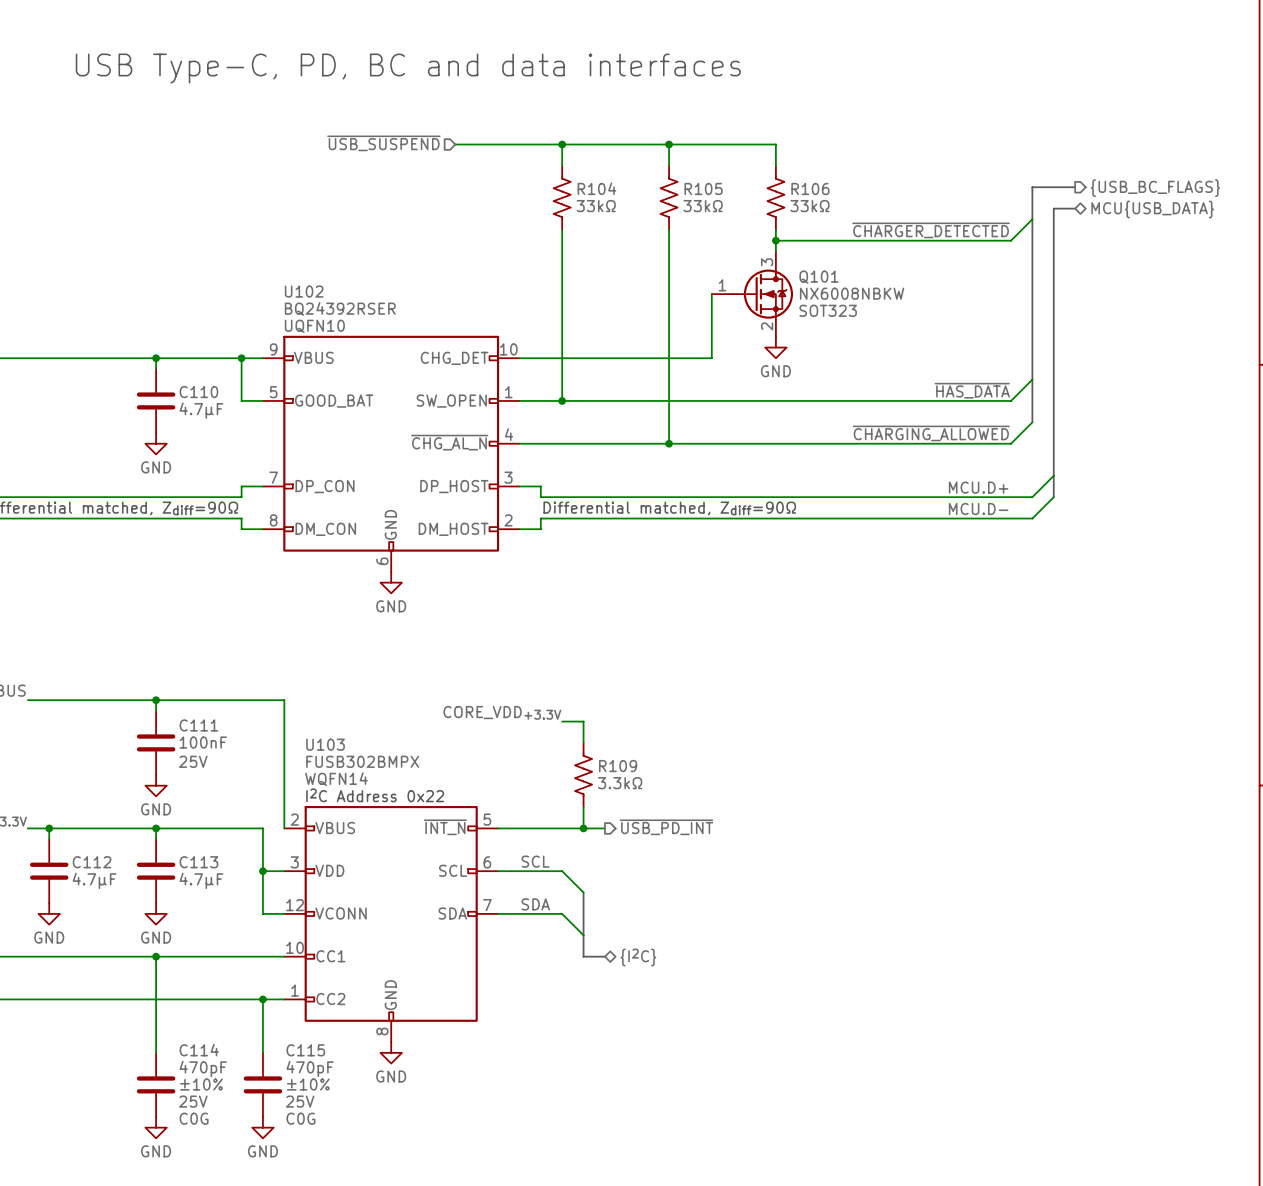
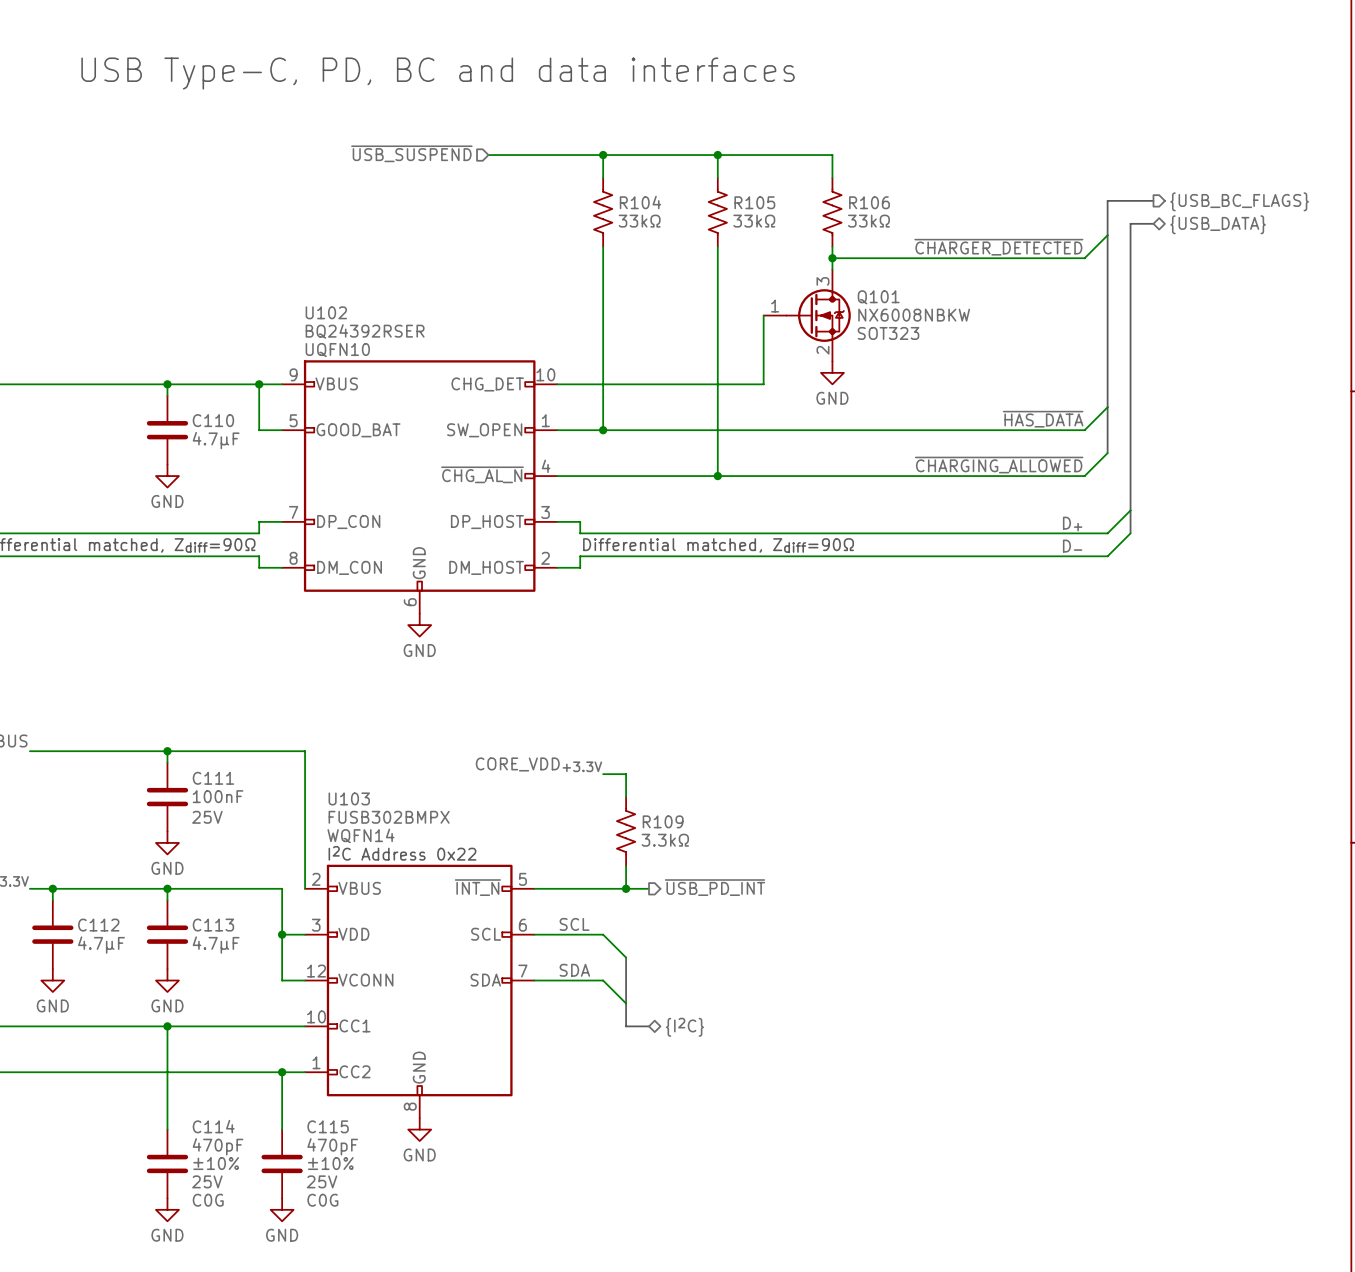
hierarchical label: MCU{USB_DATA} (1152, 209) -> {USB_DATA} (1218, 224)
label: MCU.D+ (978, 487) -> D+ (1072, 524)
label: MCU.D- (978, 508) -> D- (1072, 546)

